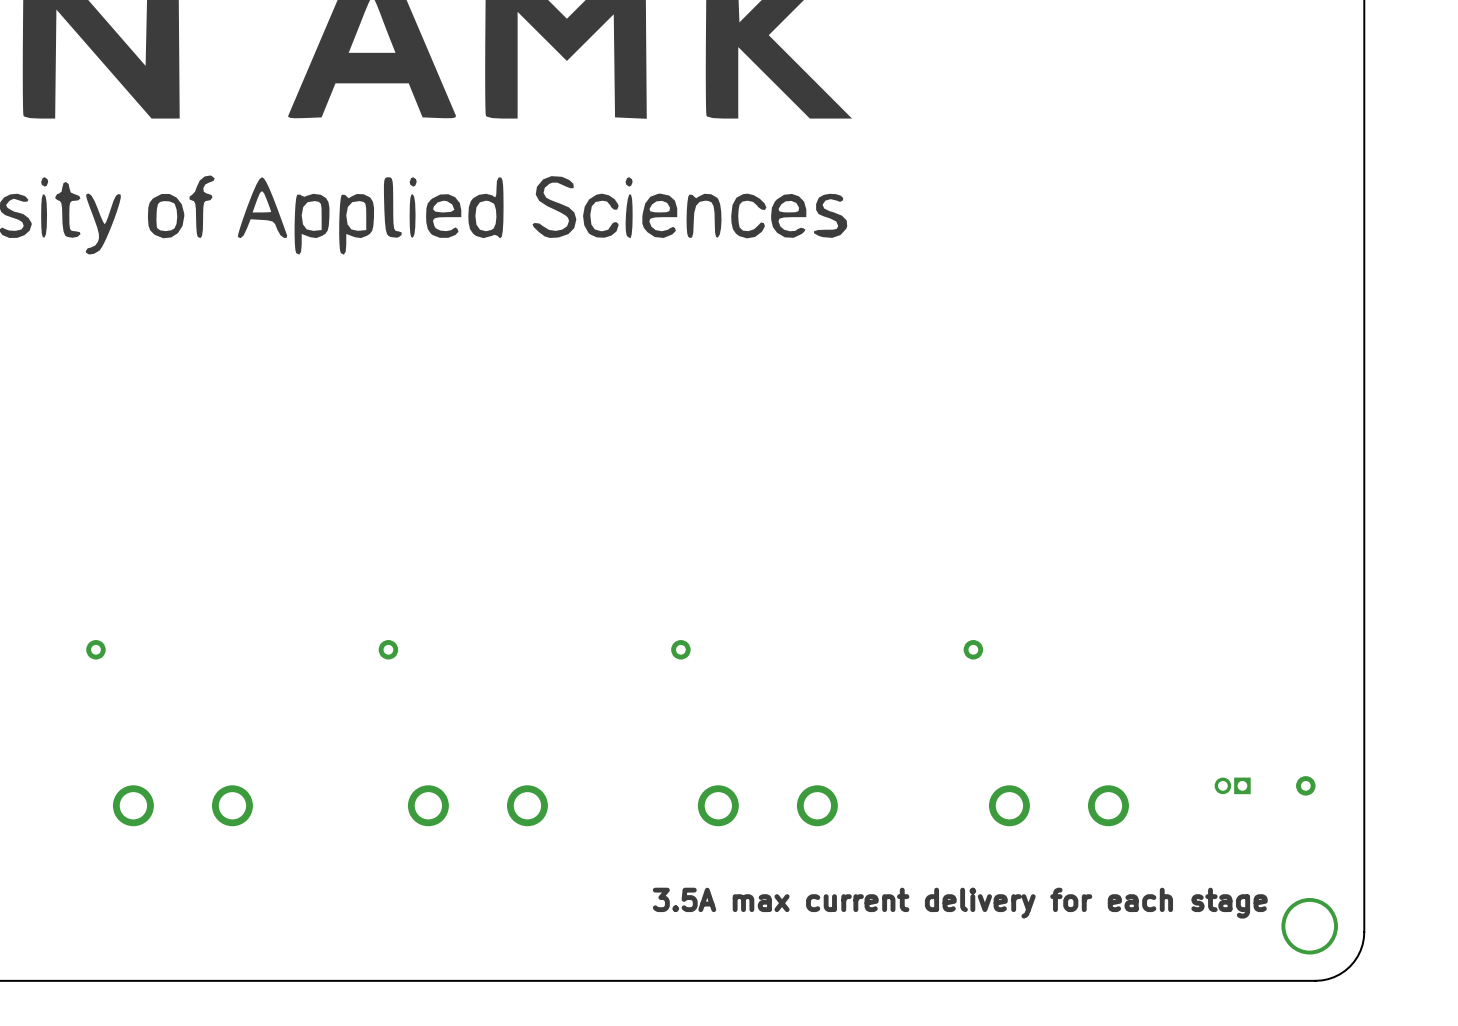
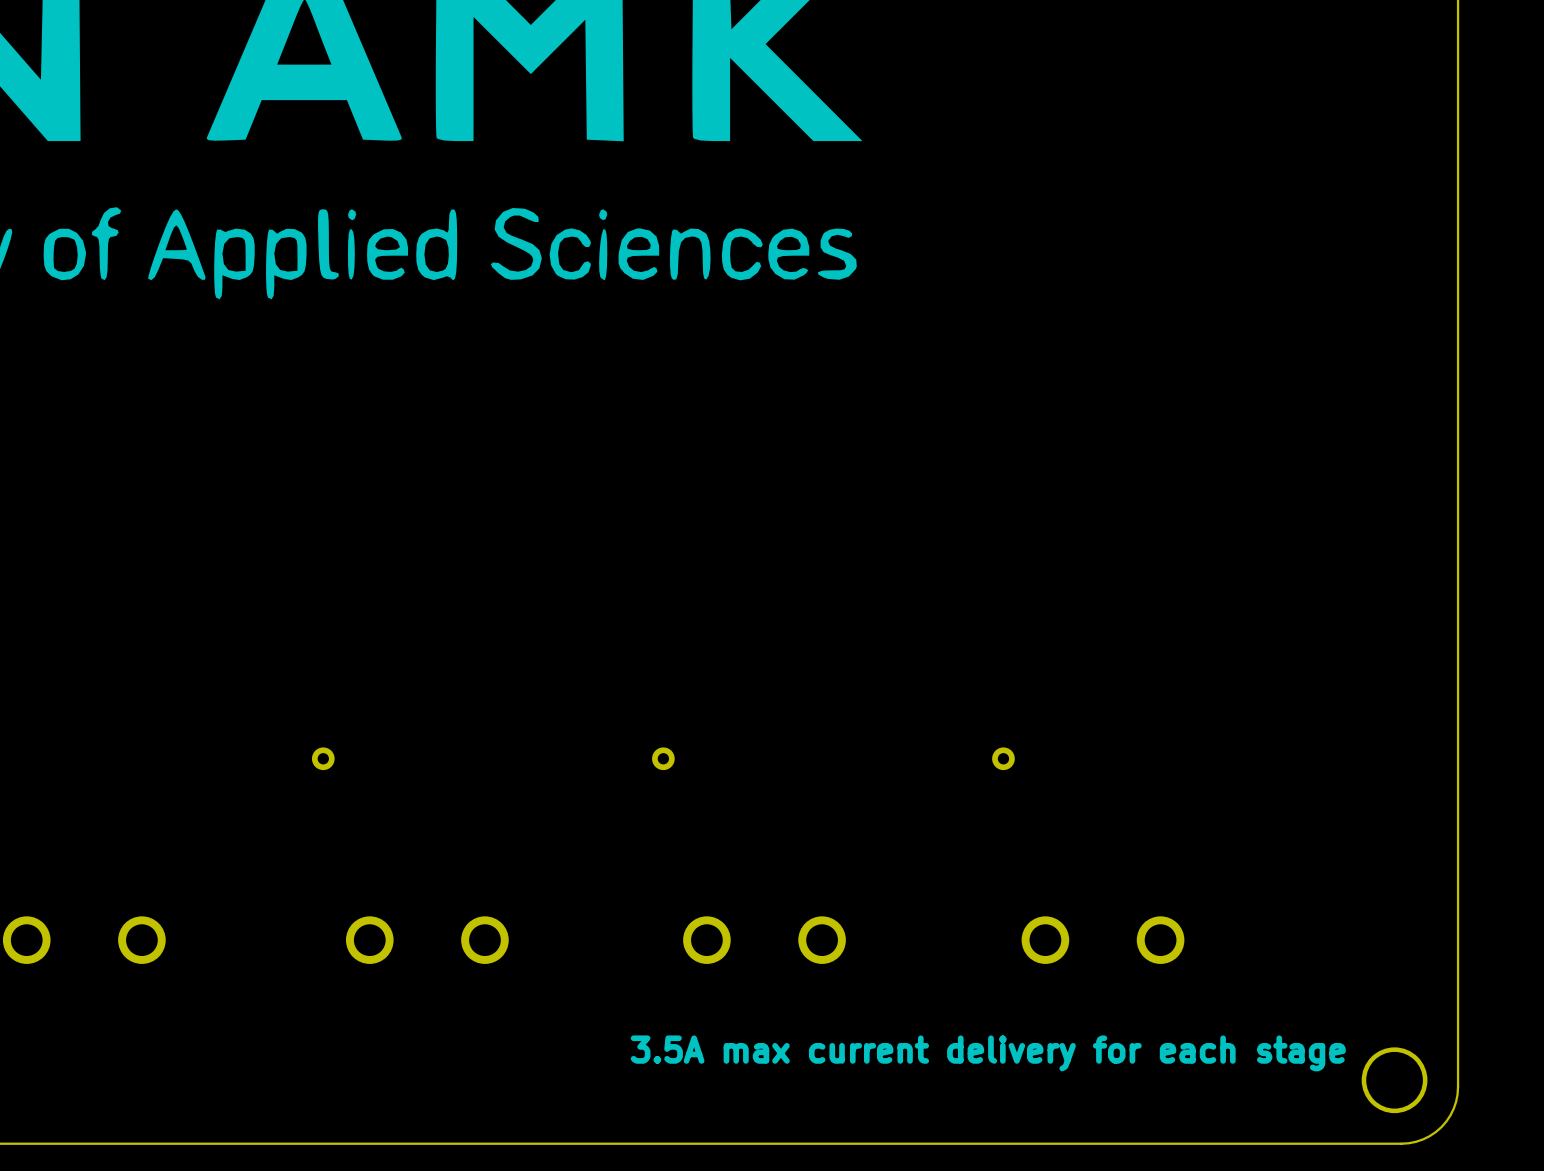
part: (1232, 785) -> none
part: (1305, 785) -> none

